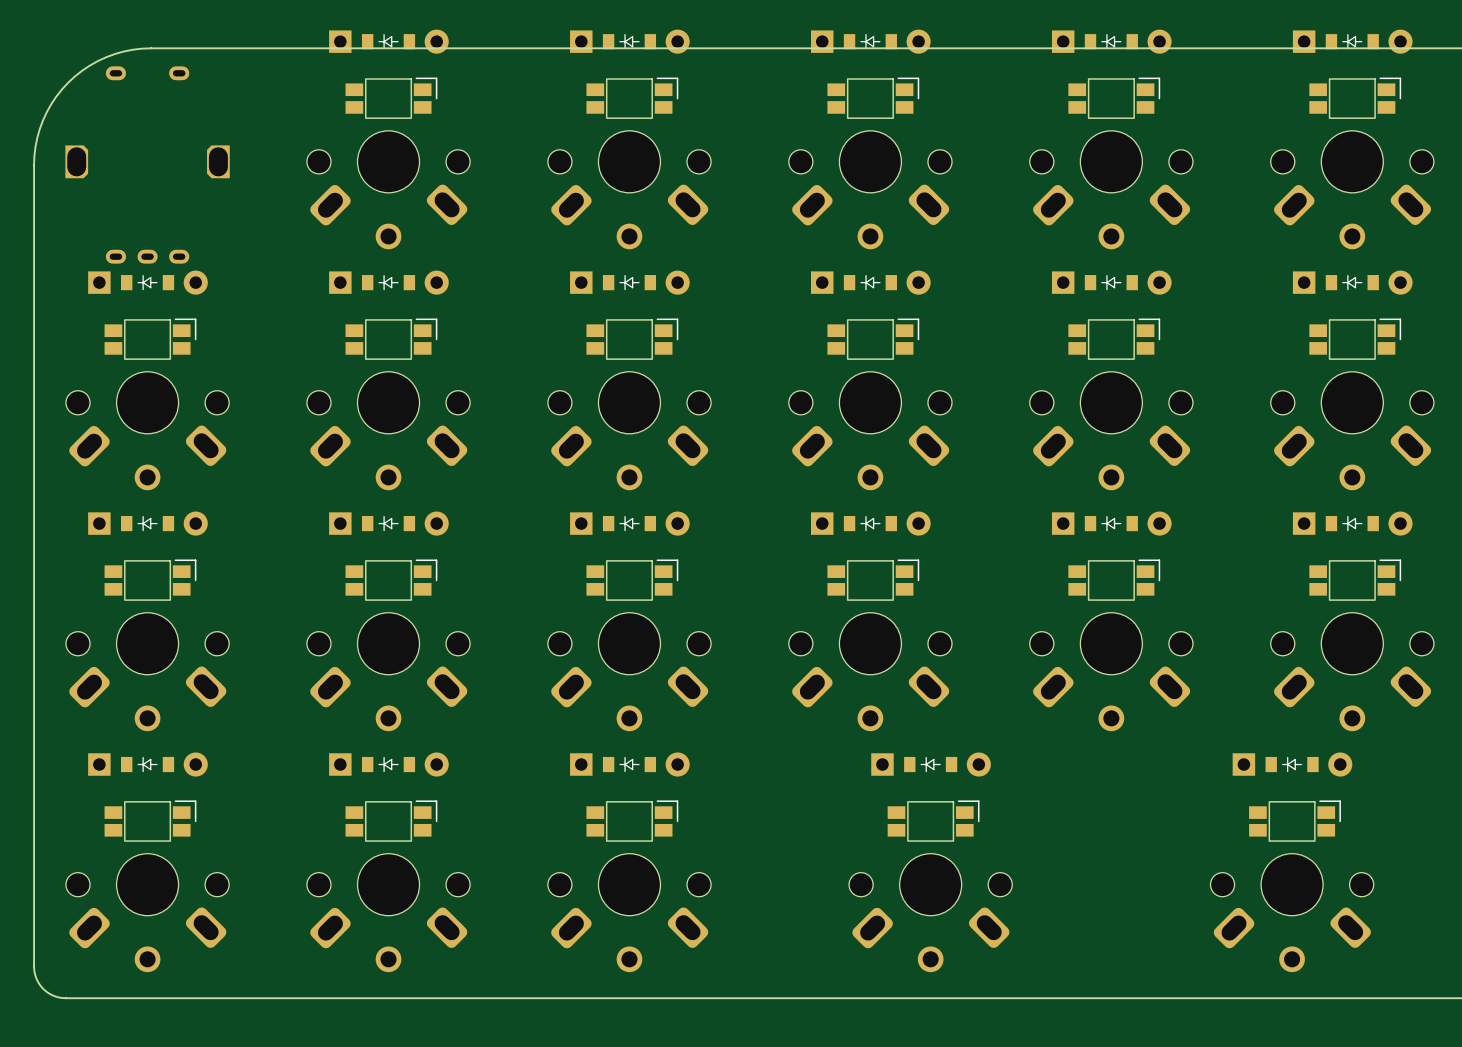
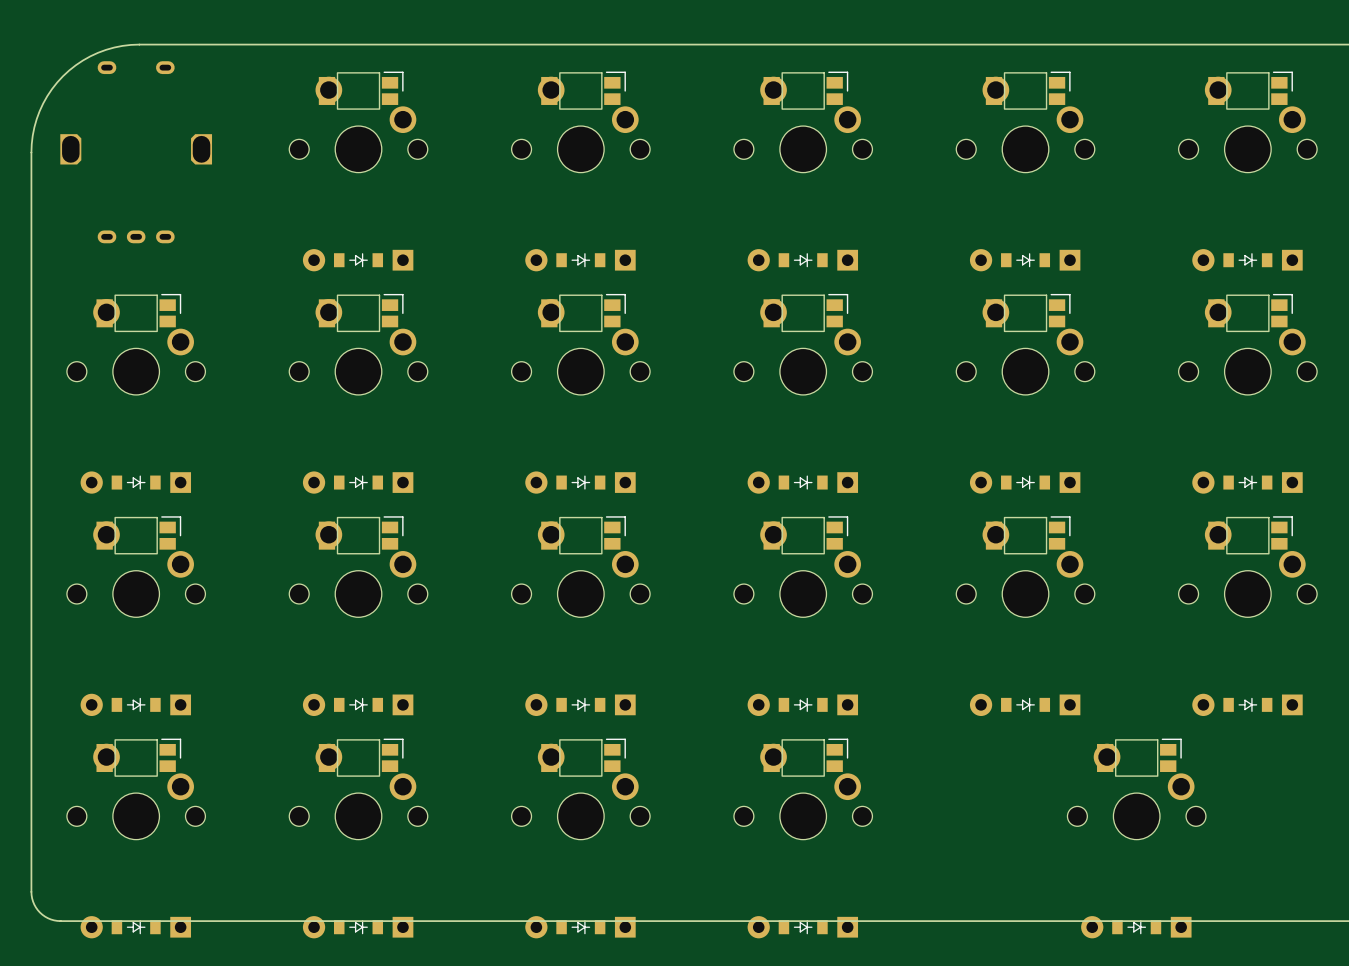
part: (388, 41) -> none
part: (629, 41) -> none
part: (870, 41) -> none
part: (1111, 41) -> none
part: (1352, 41) -> none
part: none -> (358, 124)
part: none -> (580, 124)
part: none -> (803, 124)
part: none -> (1025, 124)
part: none -> (1247, 124)
part: (388, 190) -> none
part: (629, 190) -> none
part: (870, 190) -> none
part: (1111, 190) -> none
part: (1352, 190) -> none
part: (147, 282) -> none
part rotation: 0° (388, 282) -> 180° (358, 260)
part rotation: 0° (629, 282) -> 180° (580, 260)
part rotation: 0° (870, 282) -> 180° (802, 260)
part rotation: 0° (1111, 282) -> 180° (1025, 260)
part rotation: 0° (1352, 282) -> 180° (1247, 260)
part: none -> (136, 346)
part: none -> (358, 346)
part: none -> (580, 346)
part: none -> (803, 346)
part: none -> (1025, 346)
part: none -> (1247, 346)
part: (147, 431) -> none
part: (388, 431) -> none
part: (629, 431) -> none
part: (870, 431) -> none
part: (1111, 431) -> none
part: (1352, 431) -> none
part rotation: 0° (147, 523) -> 180° (135, 482)
part rotation: 0° (388, 523) -> 180° (358, 482)
part rotation: 0° (629, 523) -> 180° (580, 482)
part rotation: 0° (870, 523) -> 180° (802, 482)
part rotation: 0° (1111, 523) -> 180° (1025, 482)
part rotation: 0° (1352, 523) -> 180° (1247, 482)
part: none -> (136, 569)
part: none -> (358, 569)
part: none -> (580, 569)
part: none -> (803, 569)
part: none -> (1025, 569)
part: none -> (1247, 569)
part: (147, 671) -> none
part: (388, 671) -> none
part: (629, 671) -> none
part: (870, 671) -> none
part: (1111, 671) -> none
part: (1352, 671) -> none
part: none -> (1025, 704)
part rotation: 0° (147, 764) -> 180° (135, 704)
part rotation: 0° (388, 764) -> 180° (358, 704)
part rotation: 0° (629, 764) -> 180° (580, 704)
part rotation: 0° (931, 764) -> 180° (802, 704)
part rotation: 0° (1292, 764) -> 180° (1247, 704)
part position: (933, 821) -> (805, 757)
part position: (1295, 821) -> (1139, 757)
part: none -> (136, 791)
part: none -> (358, 791)
part: none -> (580, 791)
part: none -> (803, 791)
part: none -> (1136, 791)
part: (147, 912) -> none
part: (388, 912) -> none
part: (629, 912) -> none
part: (930, 912) -> none
part: (1292, 912) -> none
part: none -> (135, 927)
part: none -> (358, 927)
part: none -> (580, 927)
part: none -> (802, 927)
part: none -> (1136, 927)

